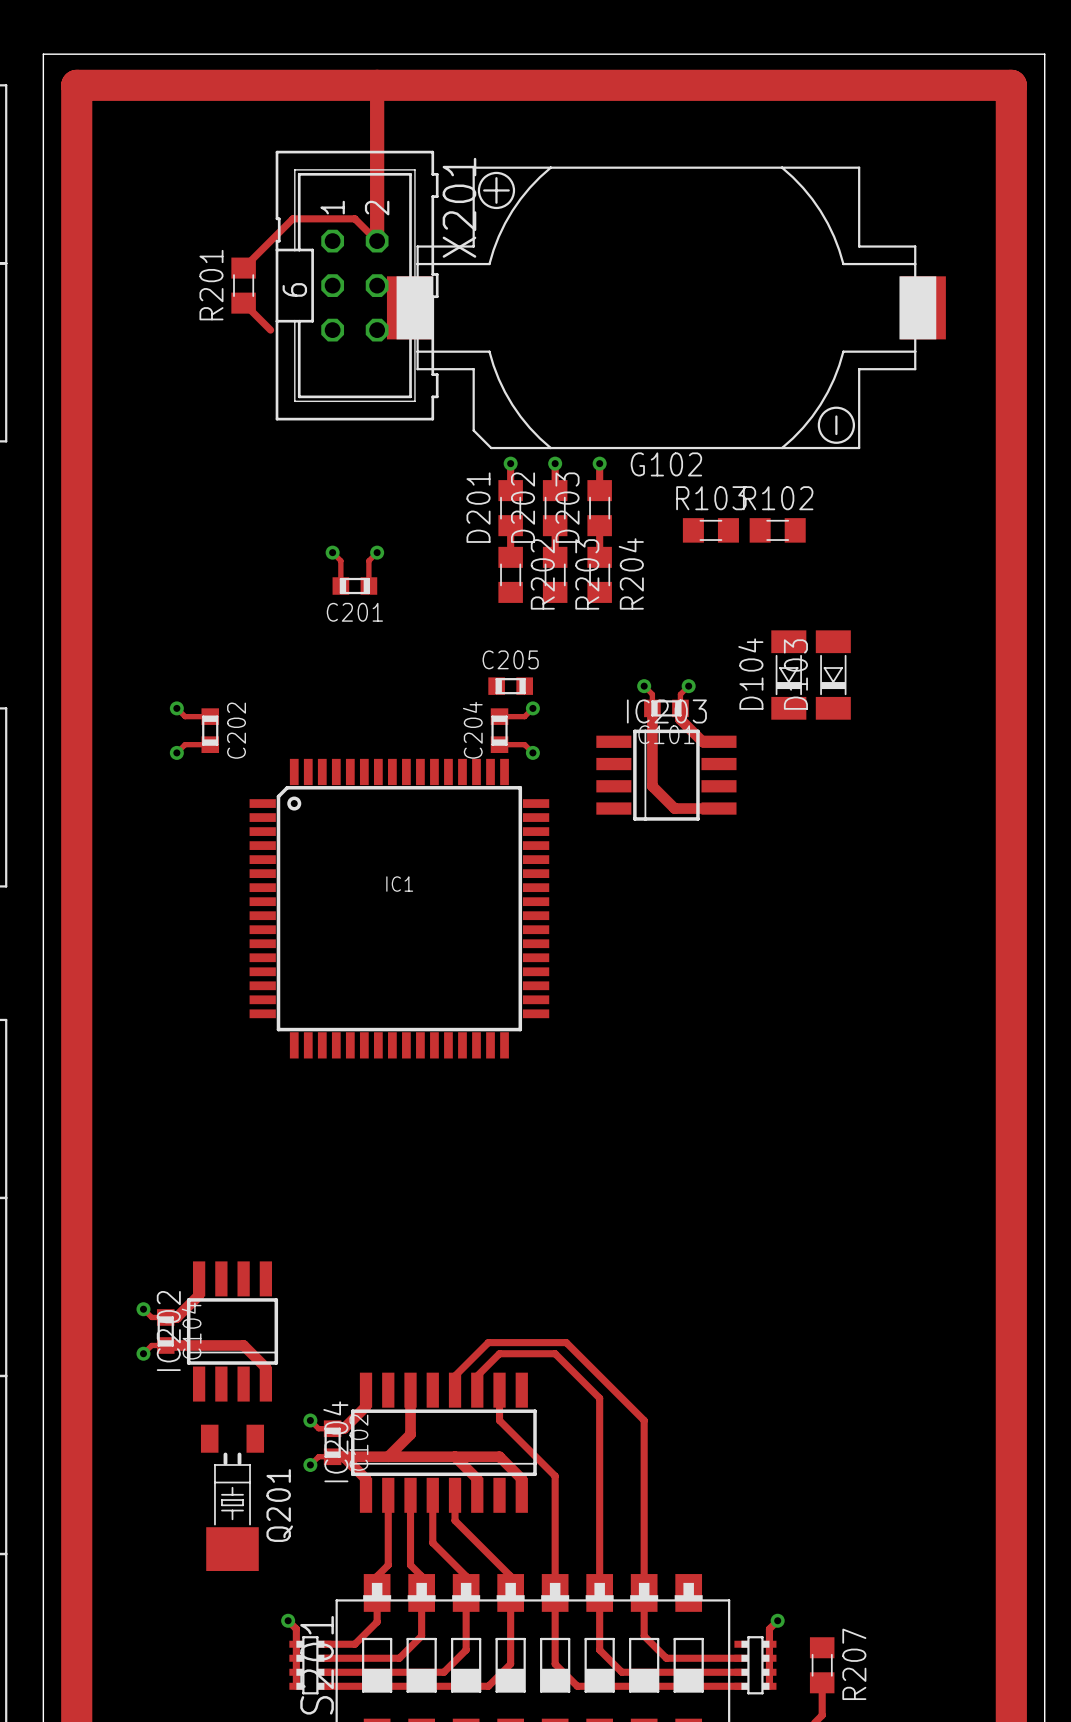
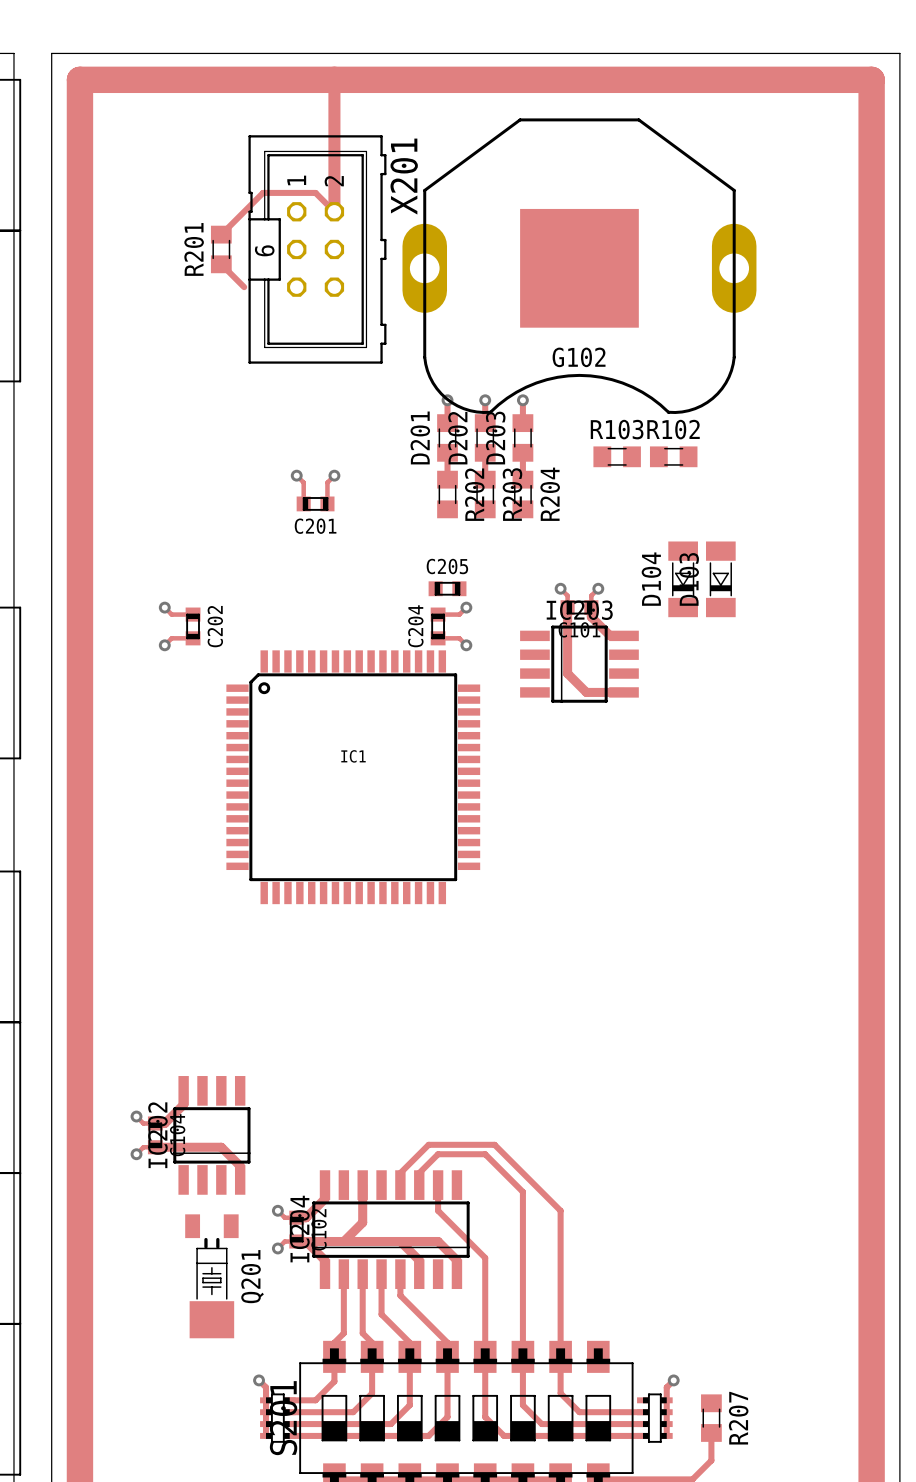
G102 footprint: [386, 166, 946, 450] -> [402, 118, 757, 414]
G102 name position: G102 (666, 464) -> G102 (579, 357)

